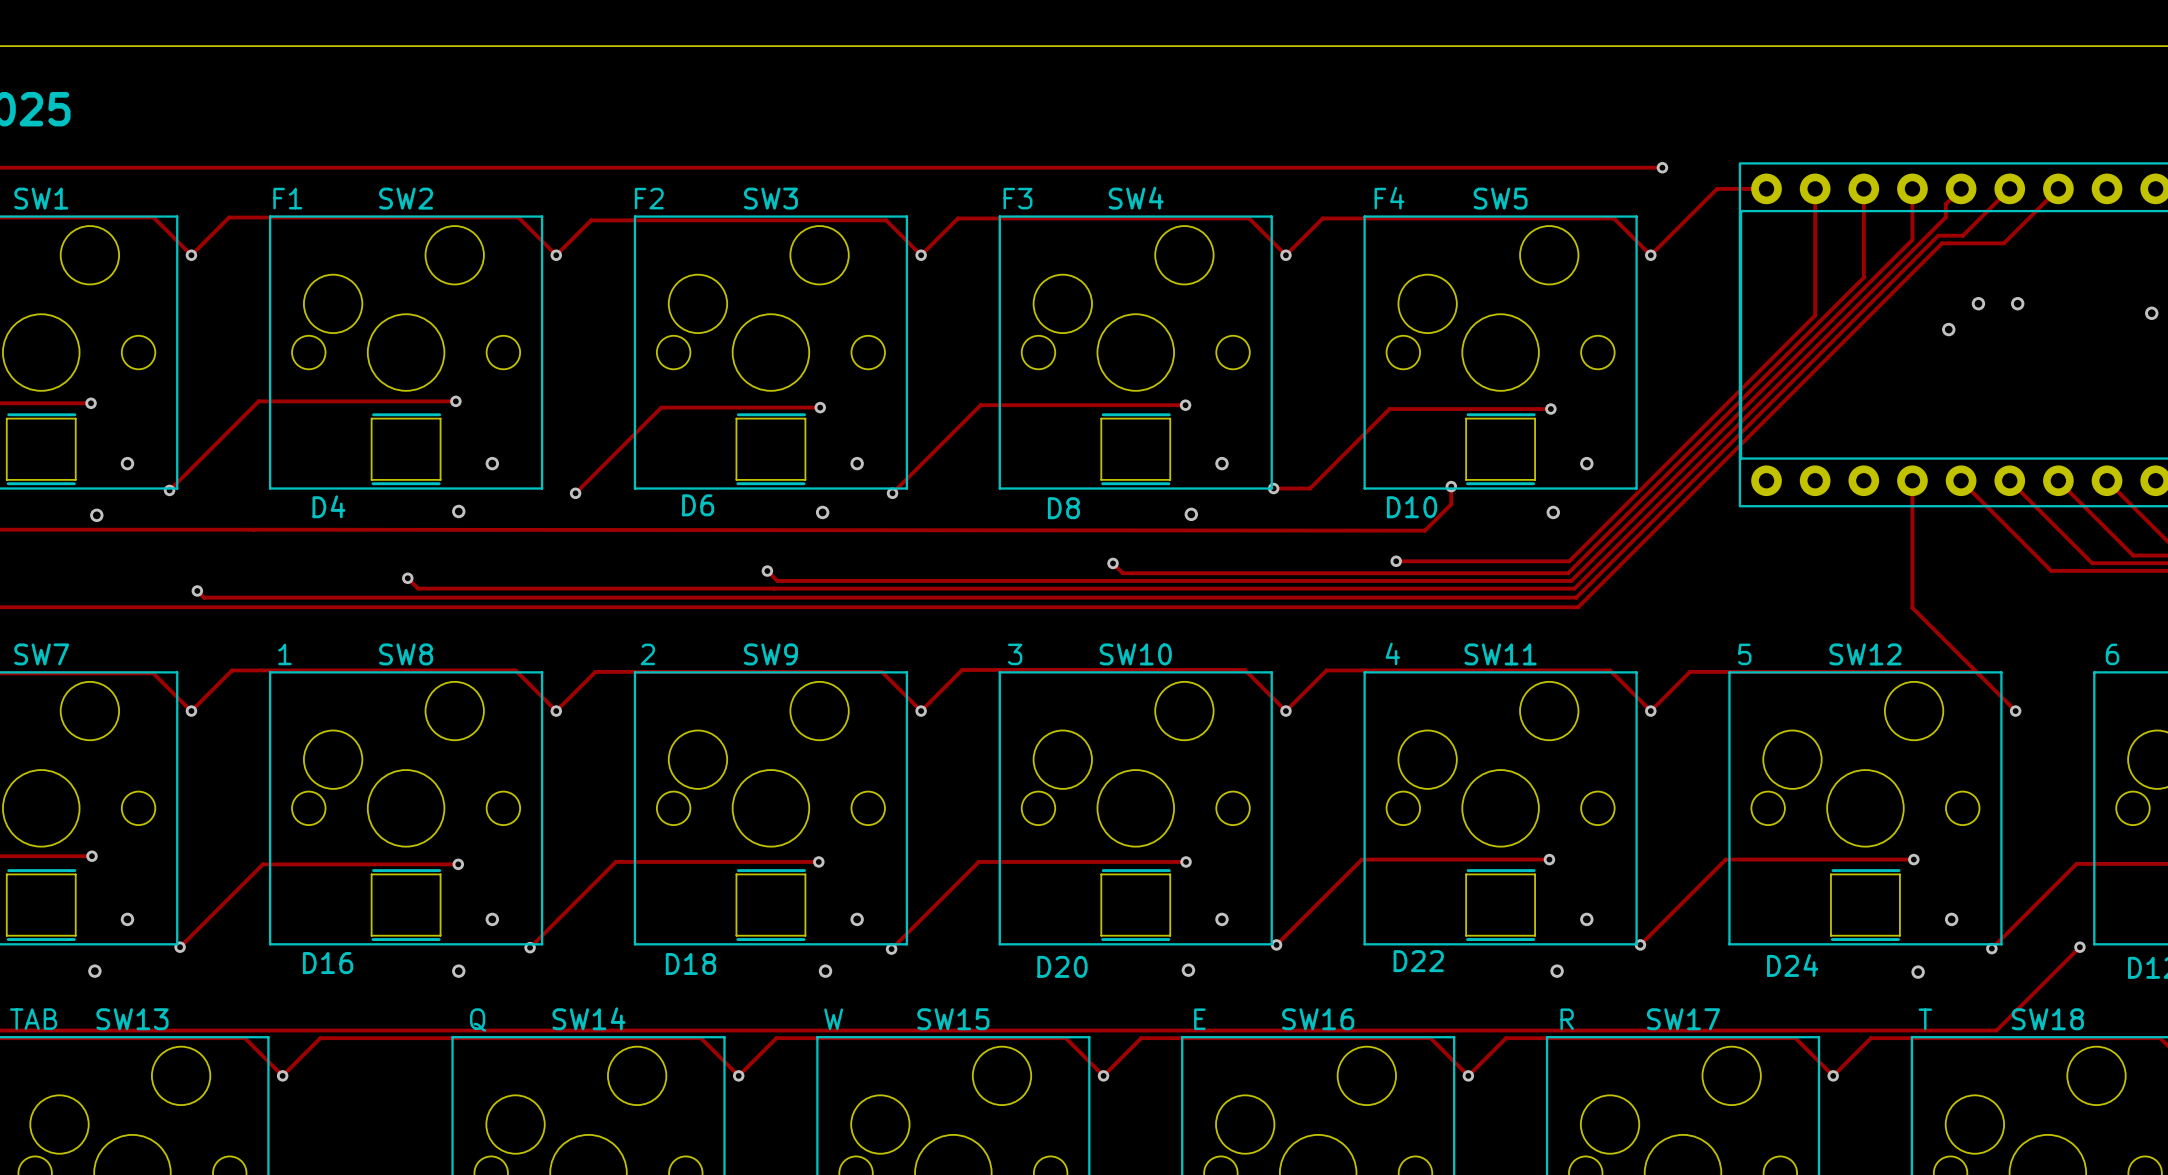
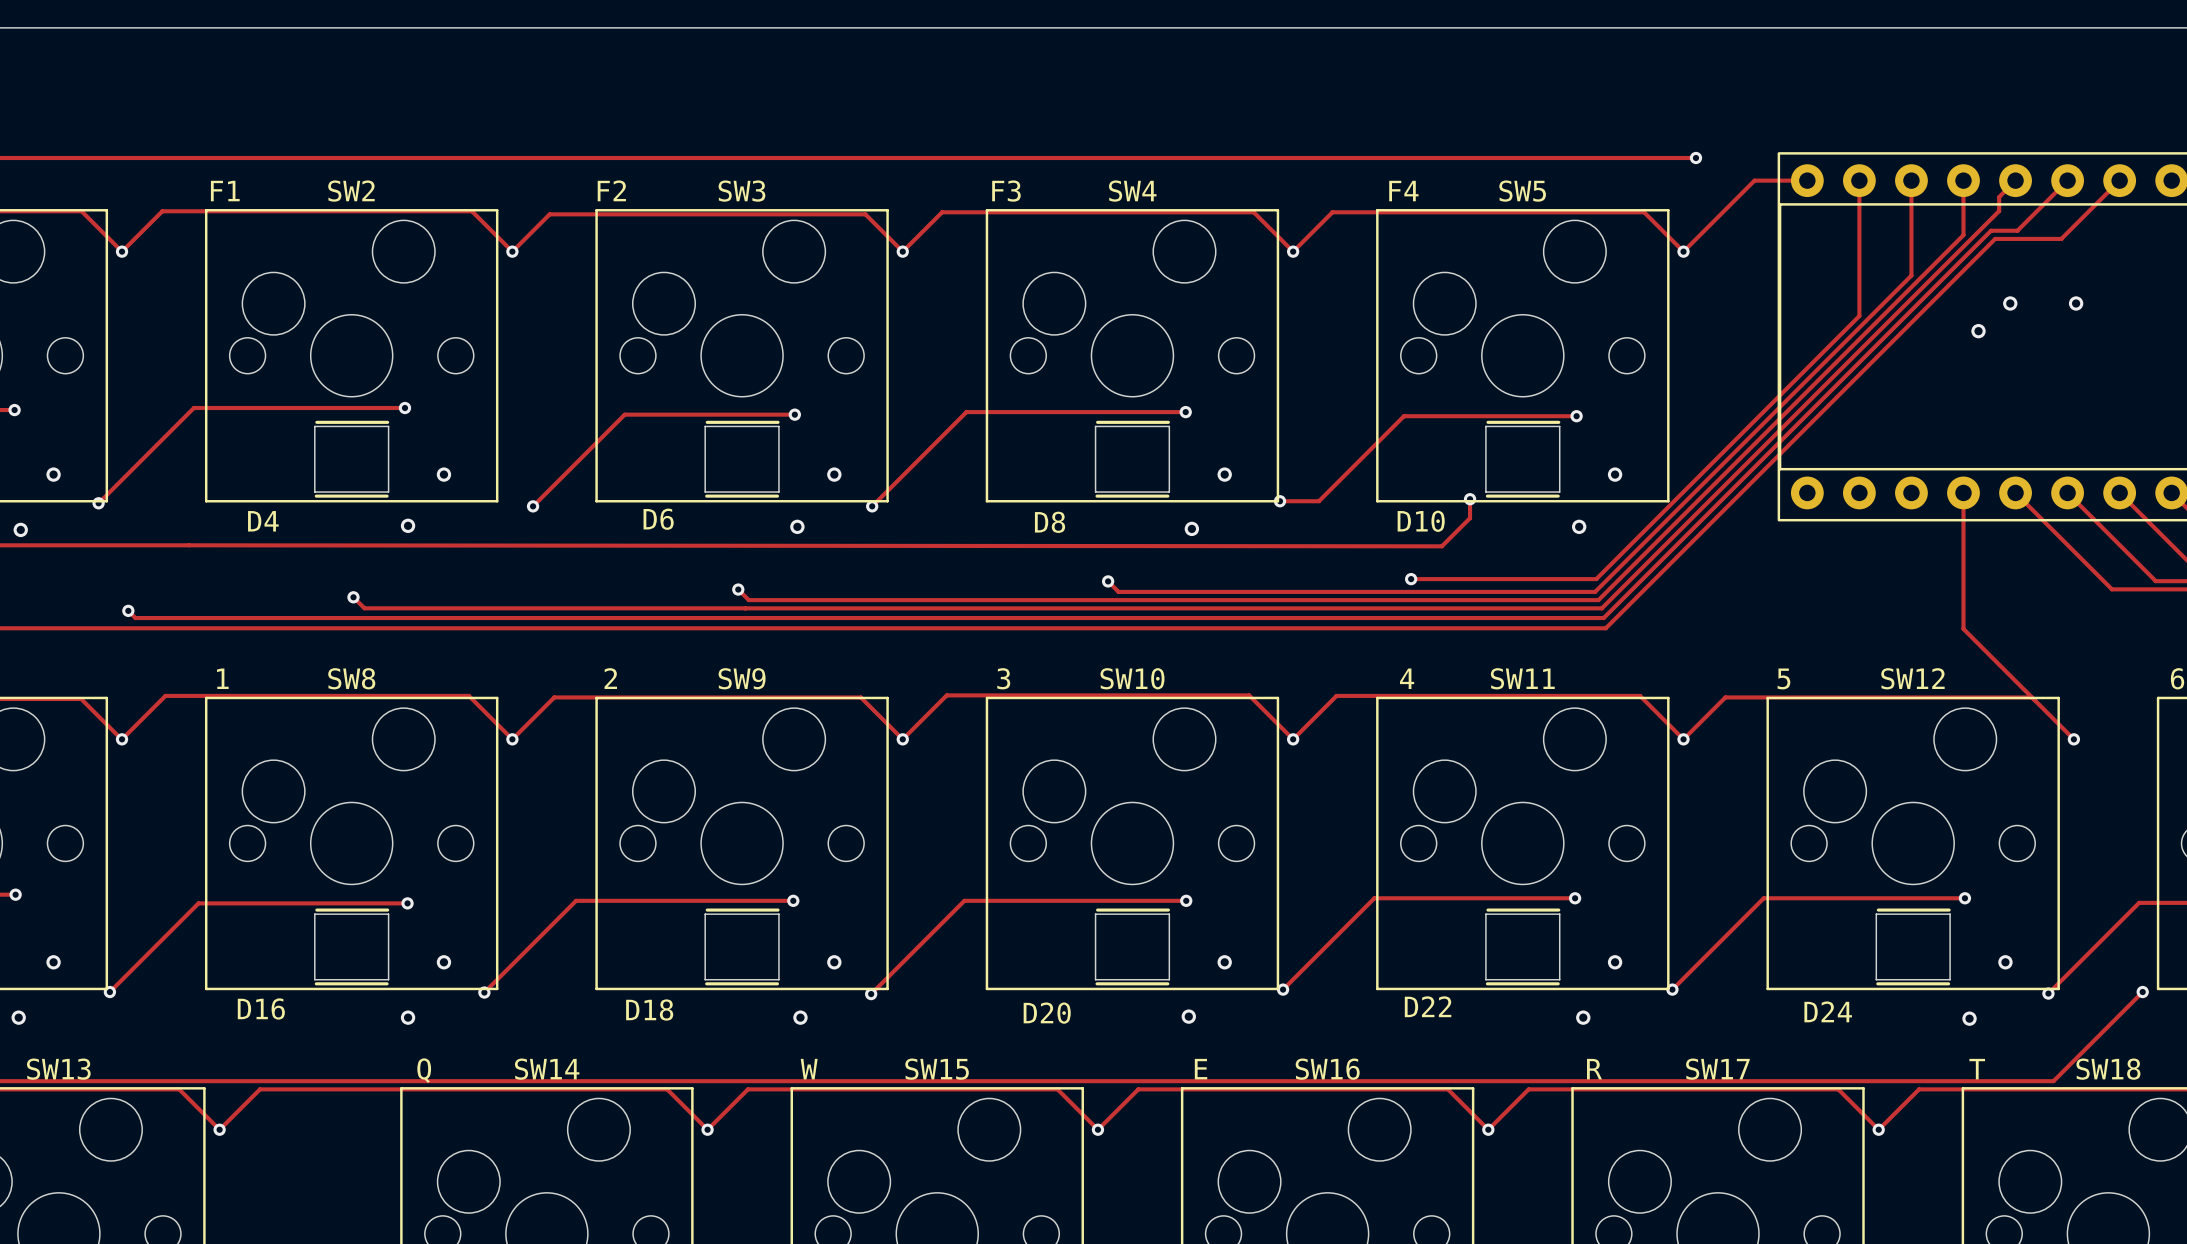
via: none -> (2010, 303)
via: (1978, 303) -> none
via: none -> (1978, 331)
via: (1948, 329) -> none

